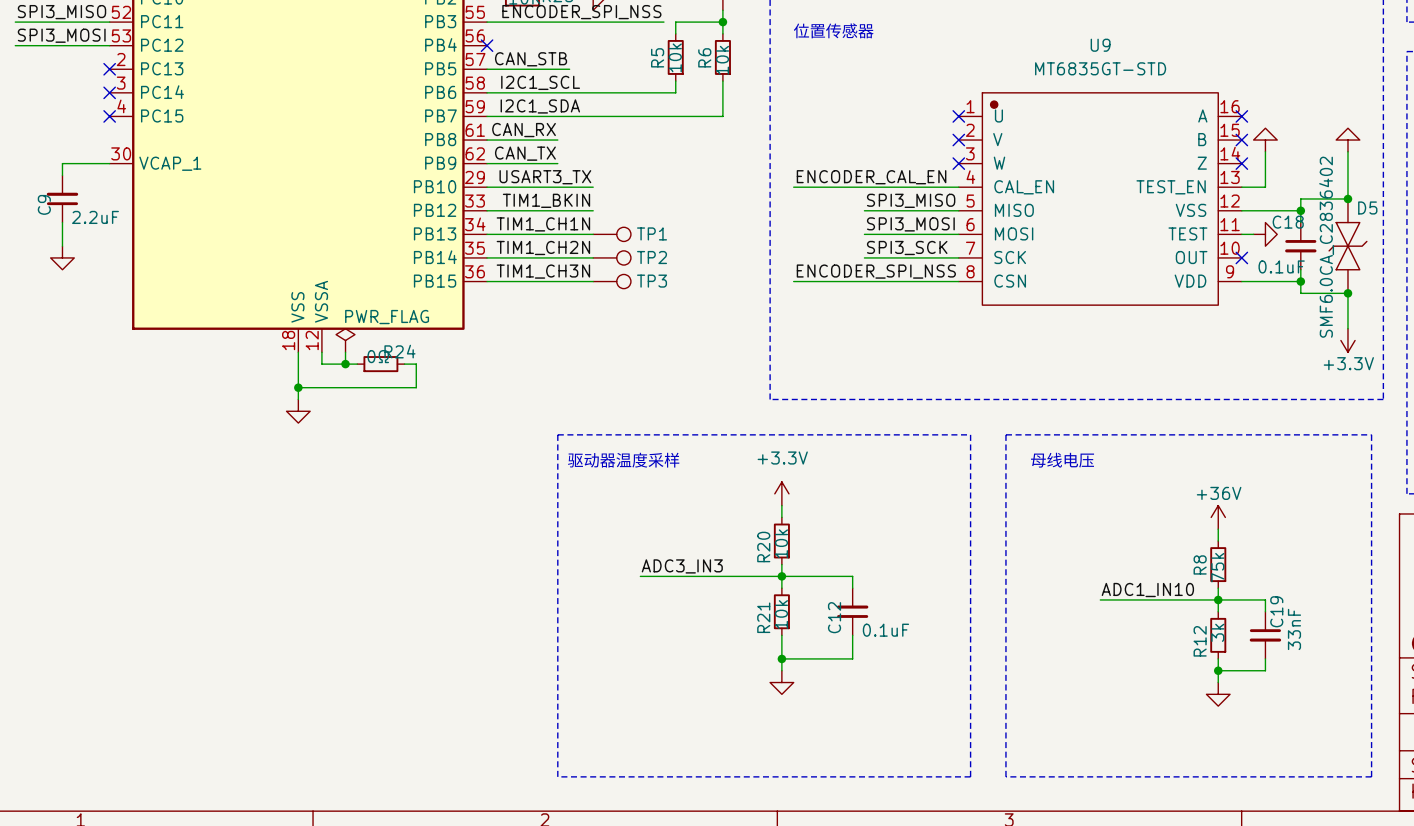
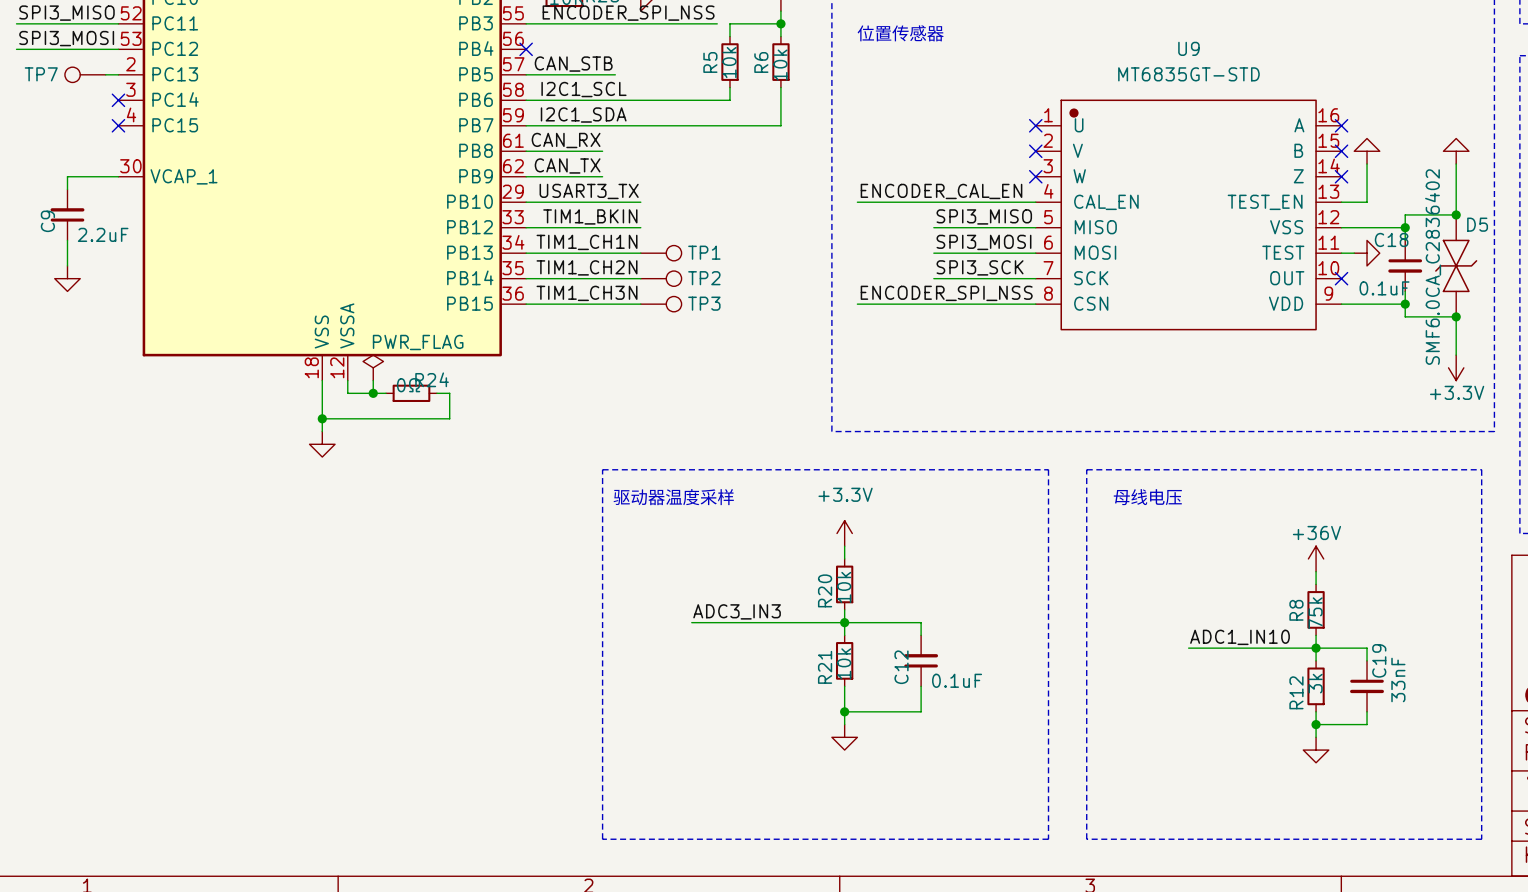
TP7: none -> (85, 74)
wire: none -> (105, 74) (118, 74)
no-connect mark: (109, 69) -> none

